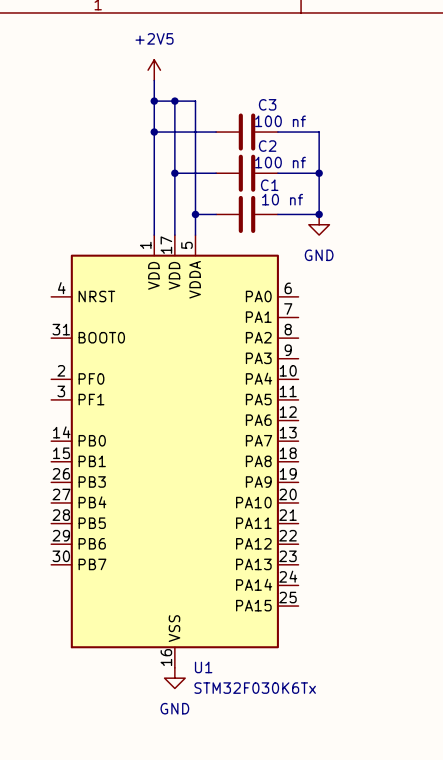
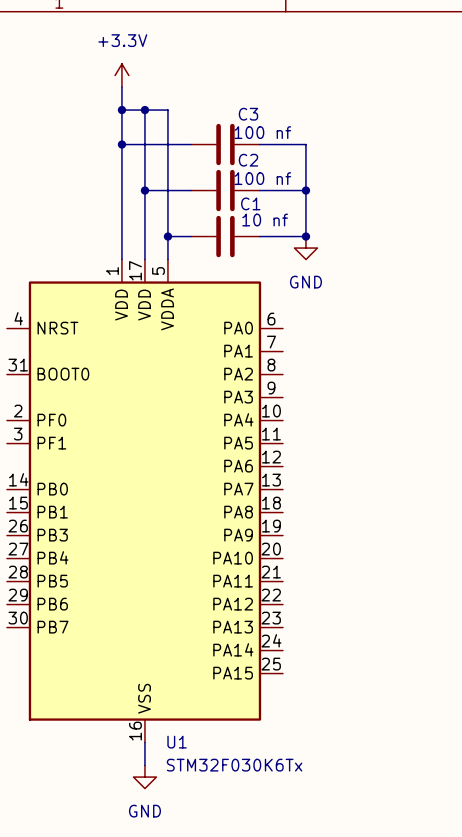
power symbol: +2V5 (154, 70) -> +3.3V (121, 75)
power symbol position: GND (174, 678) -> GND (144, 777)

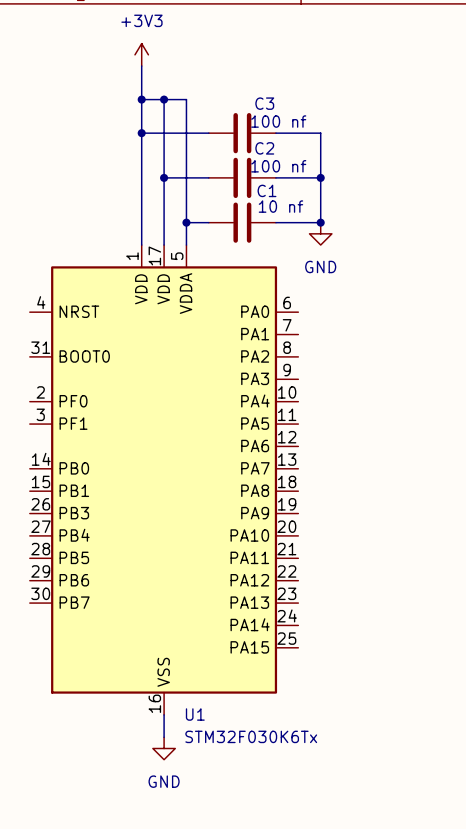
power symbol: none -> +3V3 (141, 54)
power symbol: +3.3V (121, 75) -> none

